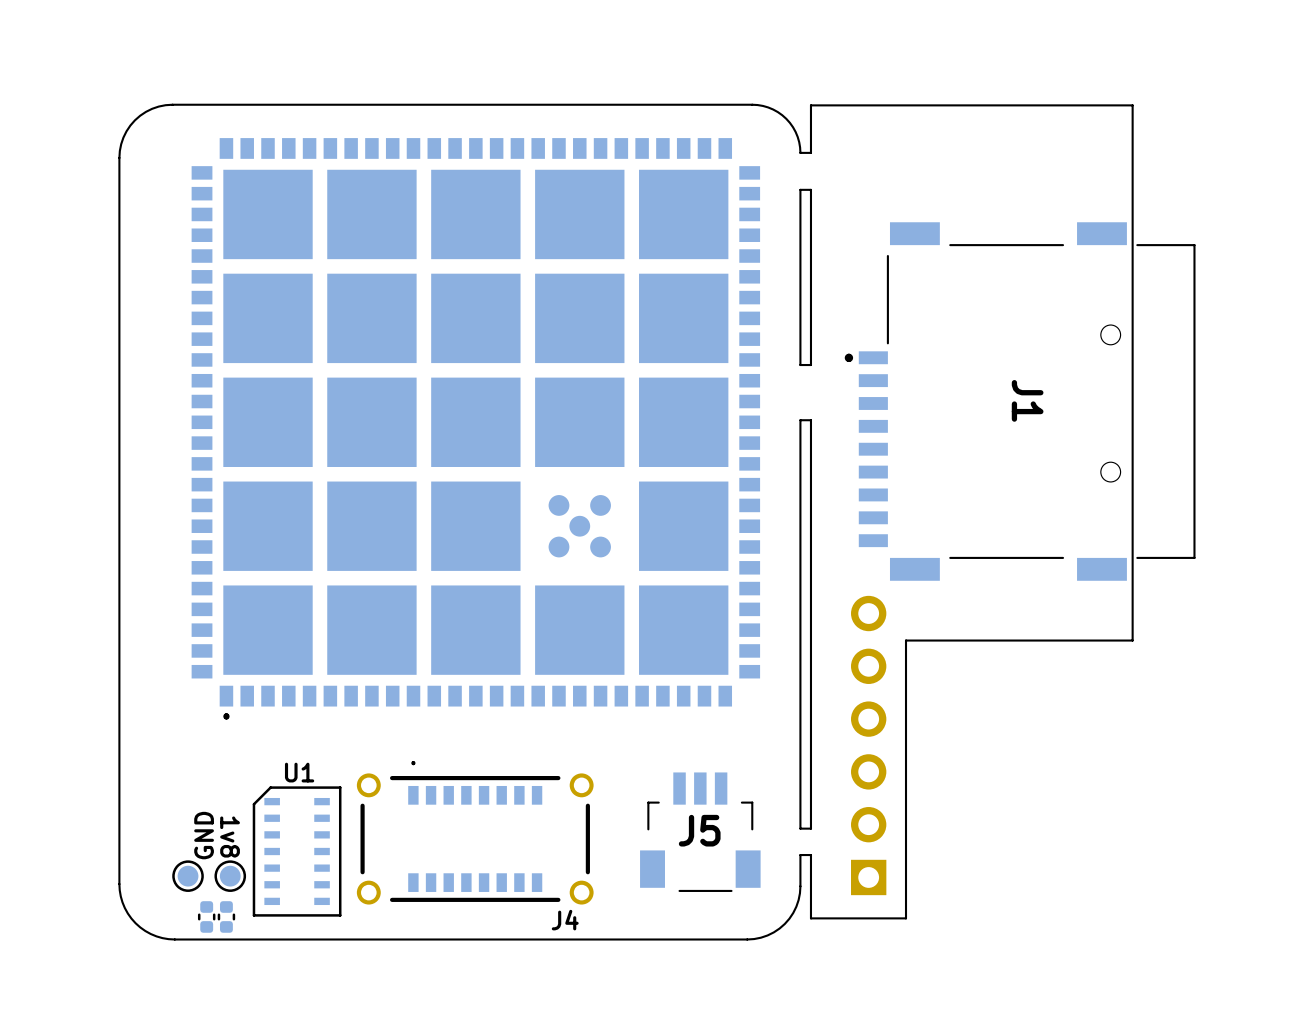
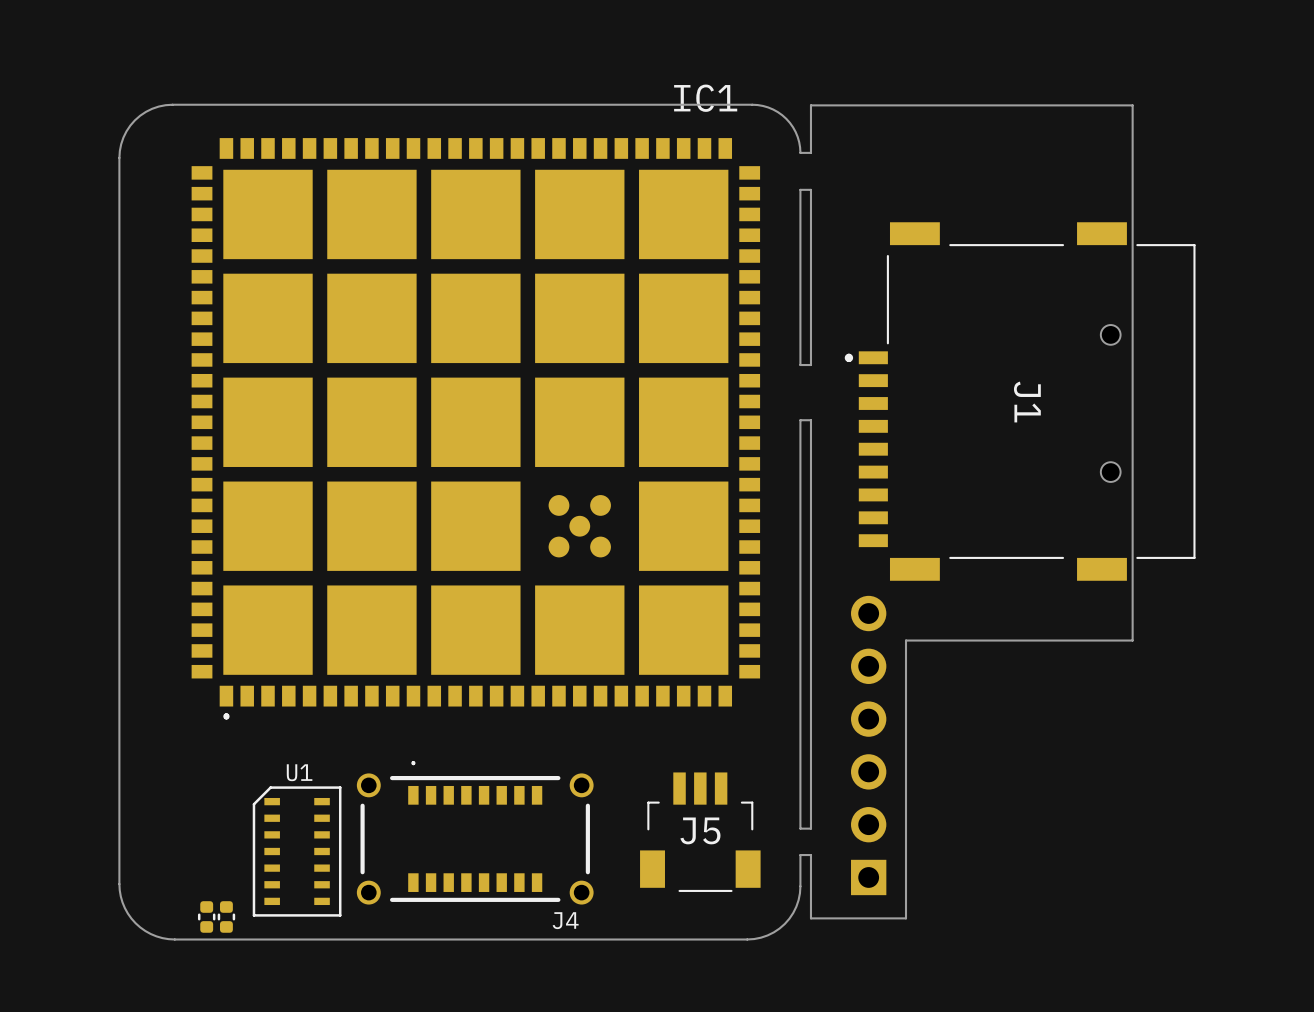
IC1 name: none -> IC1 (705, 98)
text: GND (204, 835) -> none
text: 1v8 (230, 837) -> none
part: (188, 876) -> none
part: (230, 876) -> none

